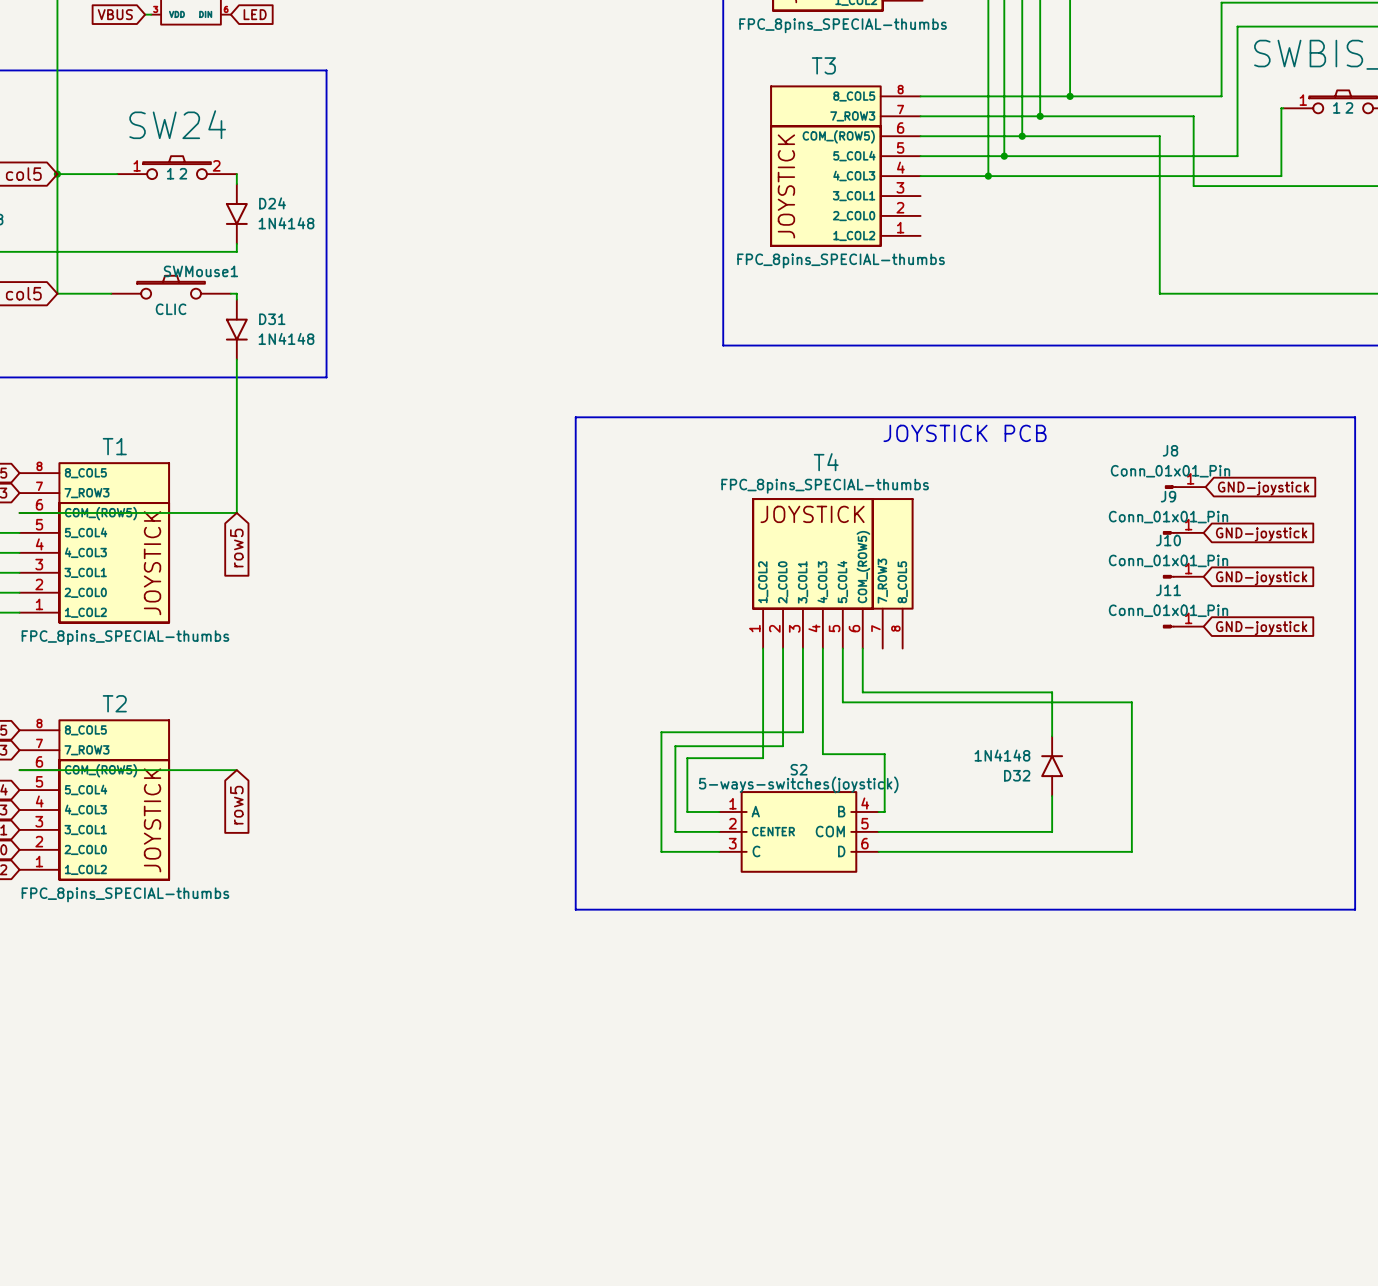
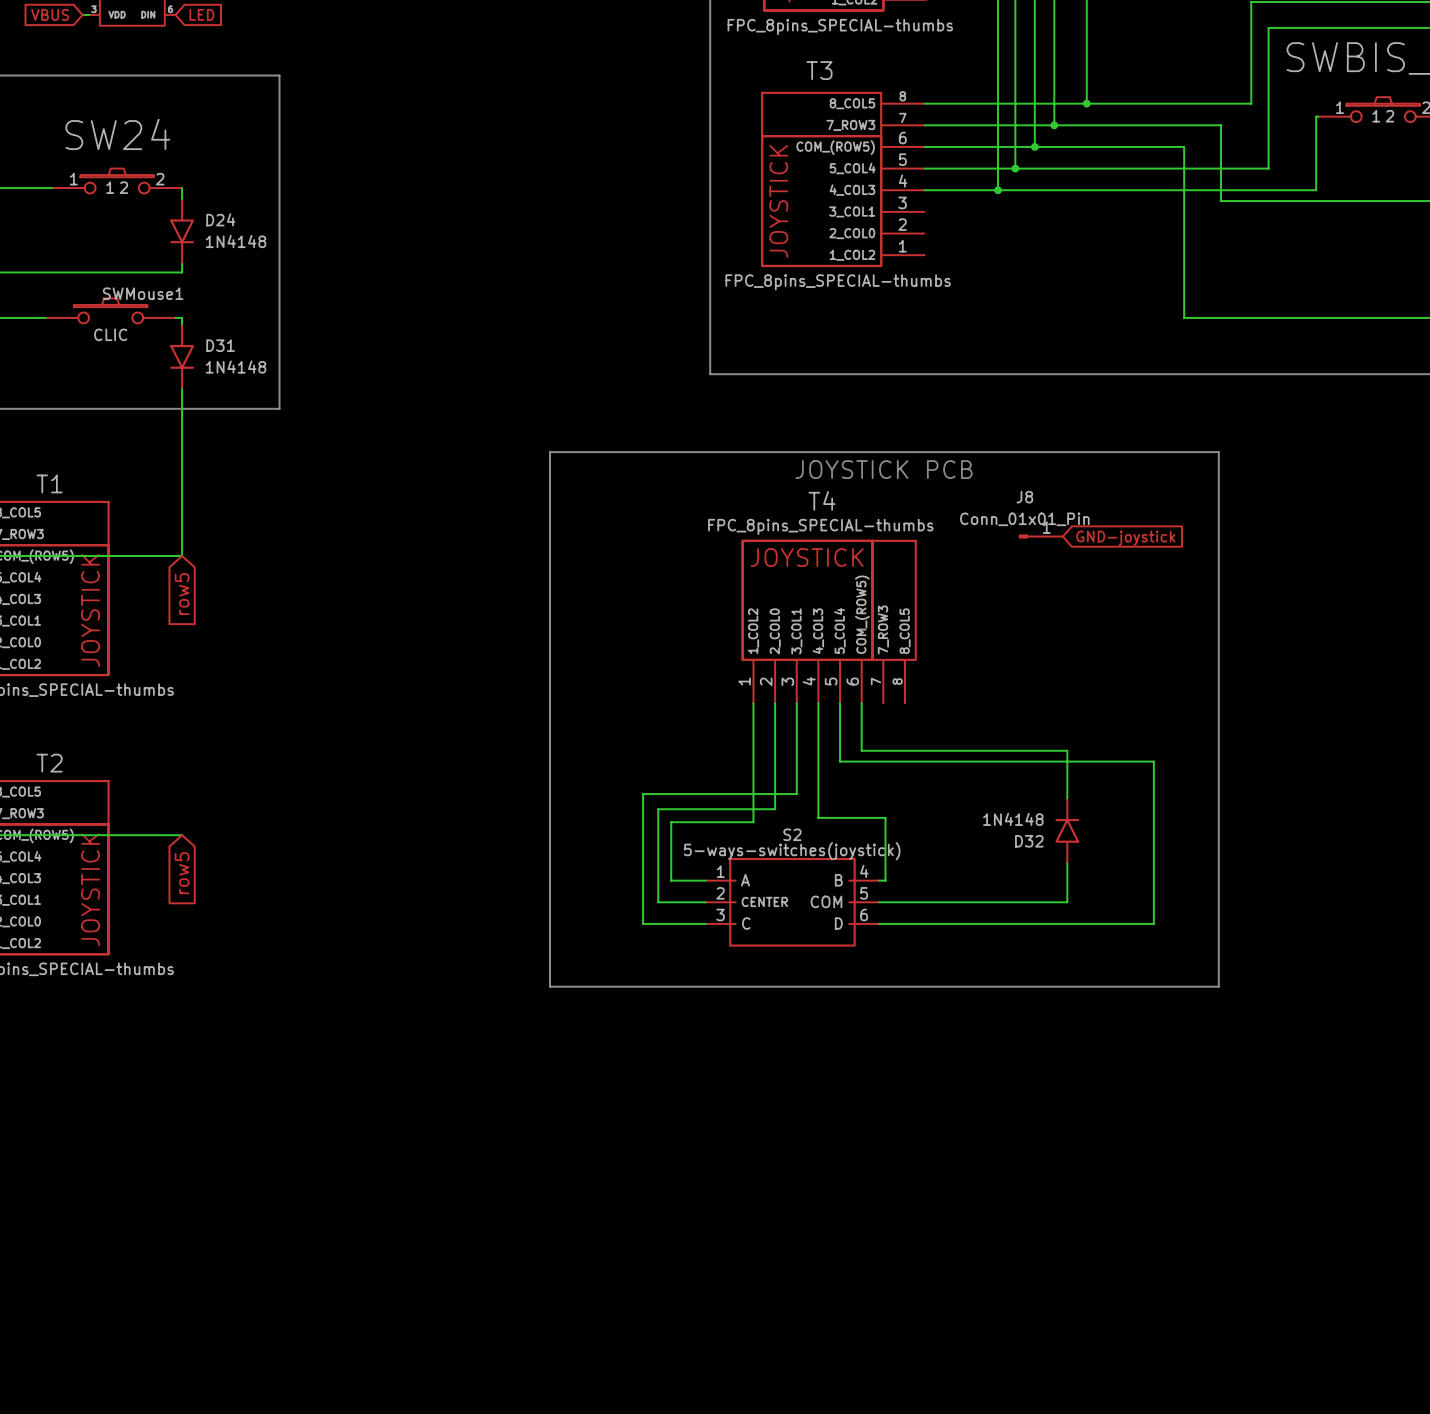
line: (1191, 417) (1355, 417) (1355, 909) (1191, 909) -> (1218, 452) (1218, 986)
text position: JOYSTICK PCB (965, 433) -> JOYSTICK PCB (884, 469)
J8 position: (1185, 487) -> (1041, 536)
global label: GND-joystick (1263, 488) -> none
global label: none -> GND-joystick (1125, 538)
J9: Conn_01x01_Pin (1183, 532) -> none
global label: GND-joystick (1261, 534) -> none
J10: Conn_01x01_Pin (1183, 576) -> none
global label: GND-joystick (1261, 578) -> none
J11: Conn_01x01_Pin (1183, 626) -> none
global label: GND-joystick (1261, 628) -> none

